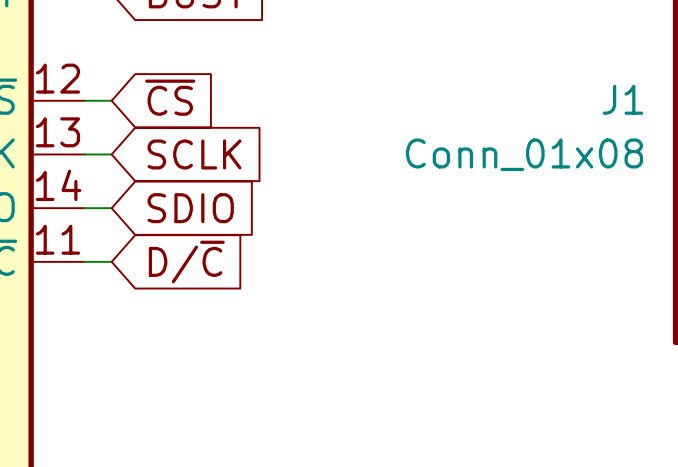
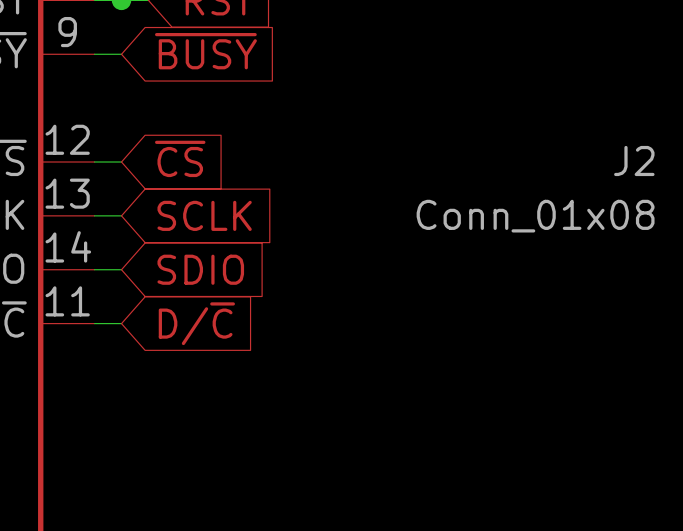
J1 name: J1 (622, 99) -> J2 (634, 160)

